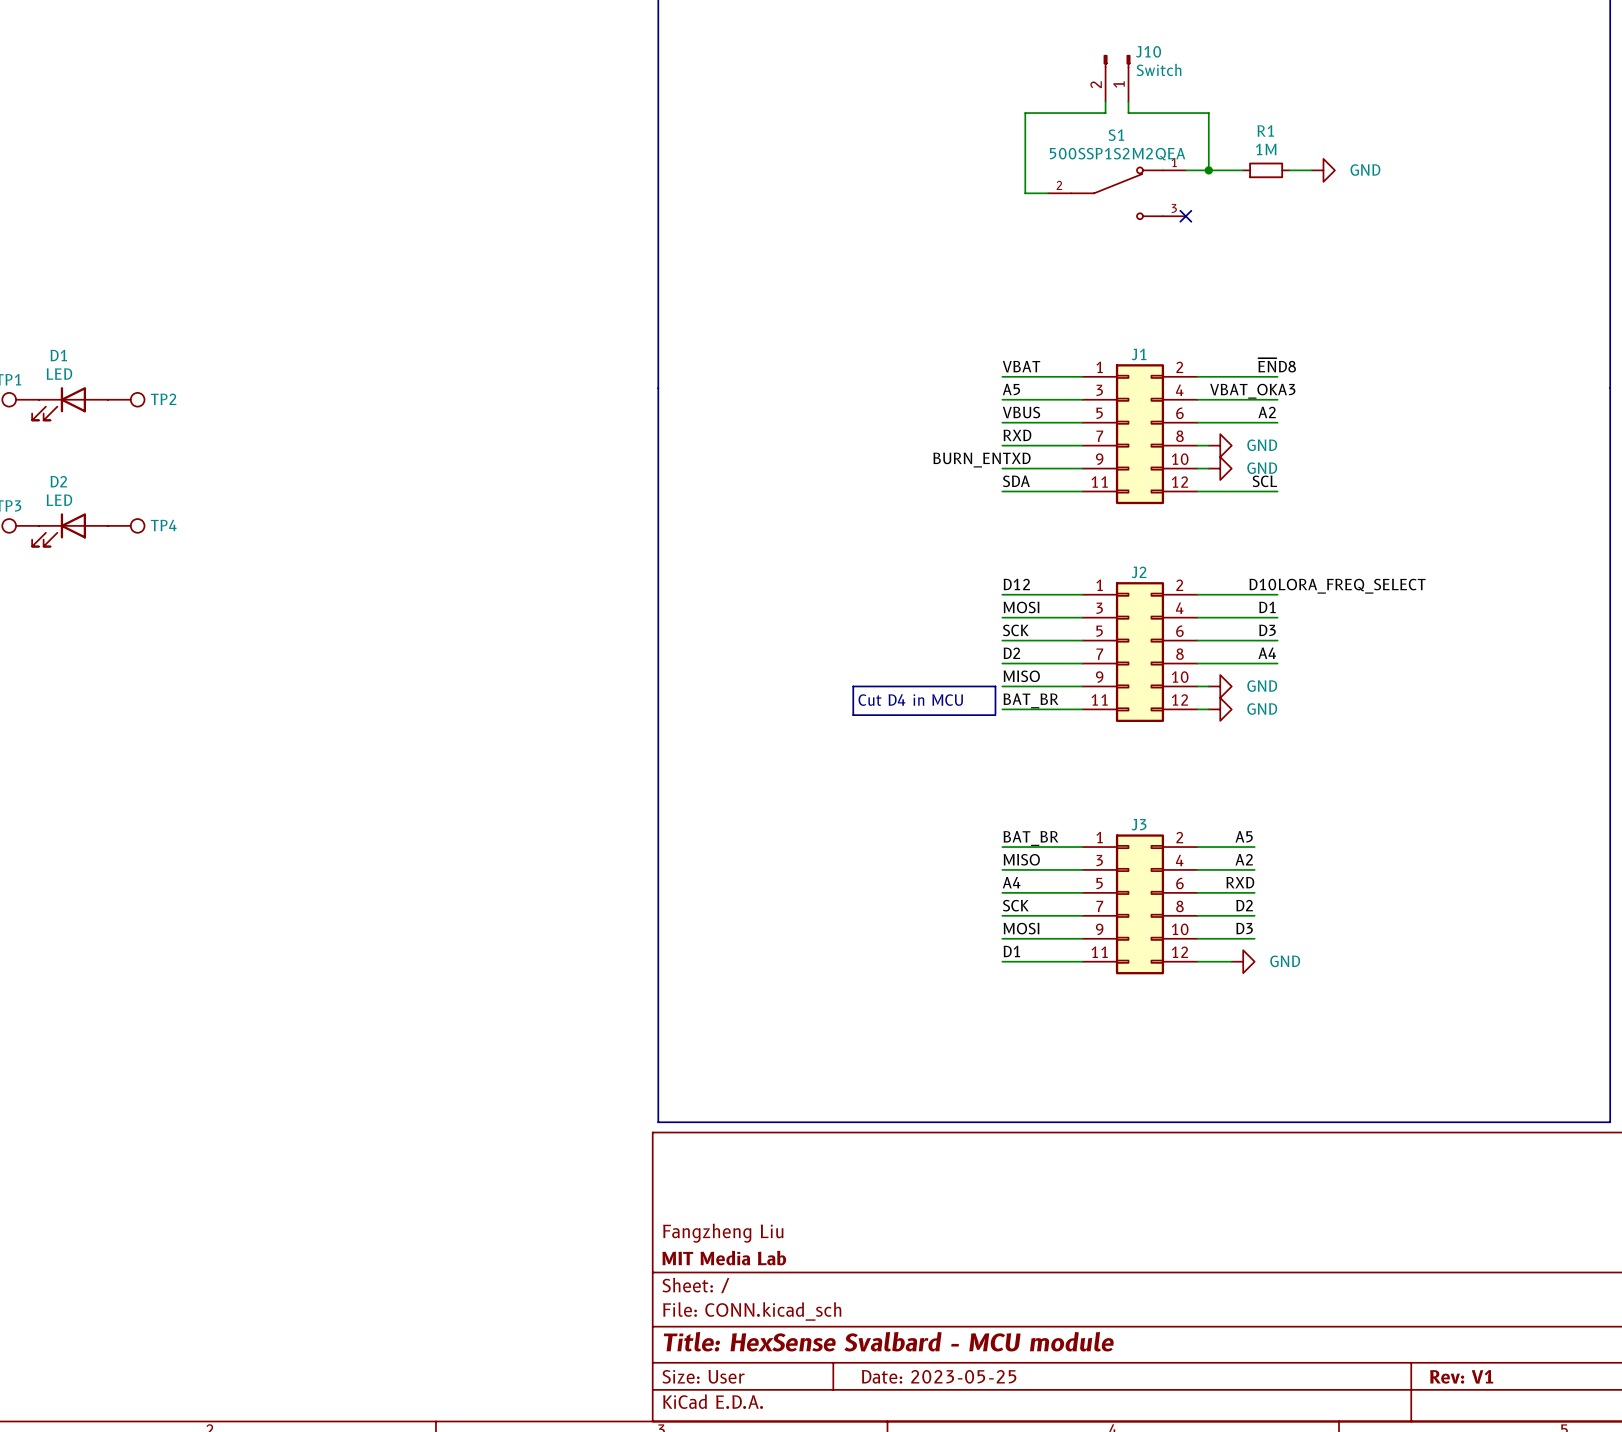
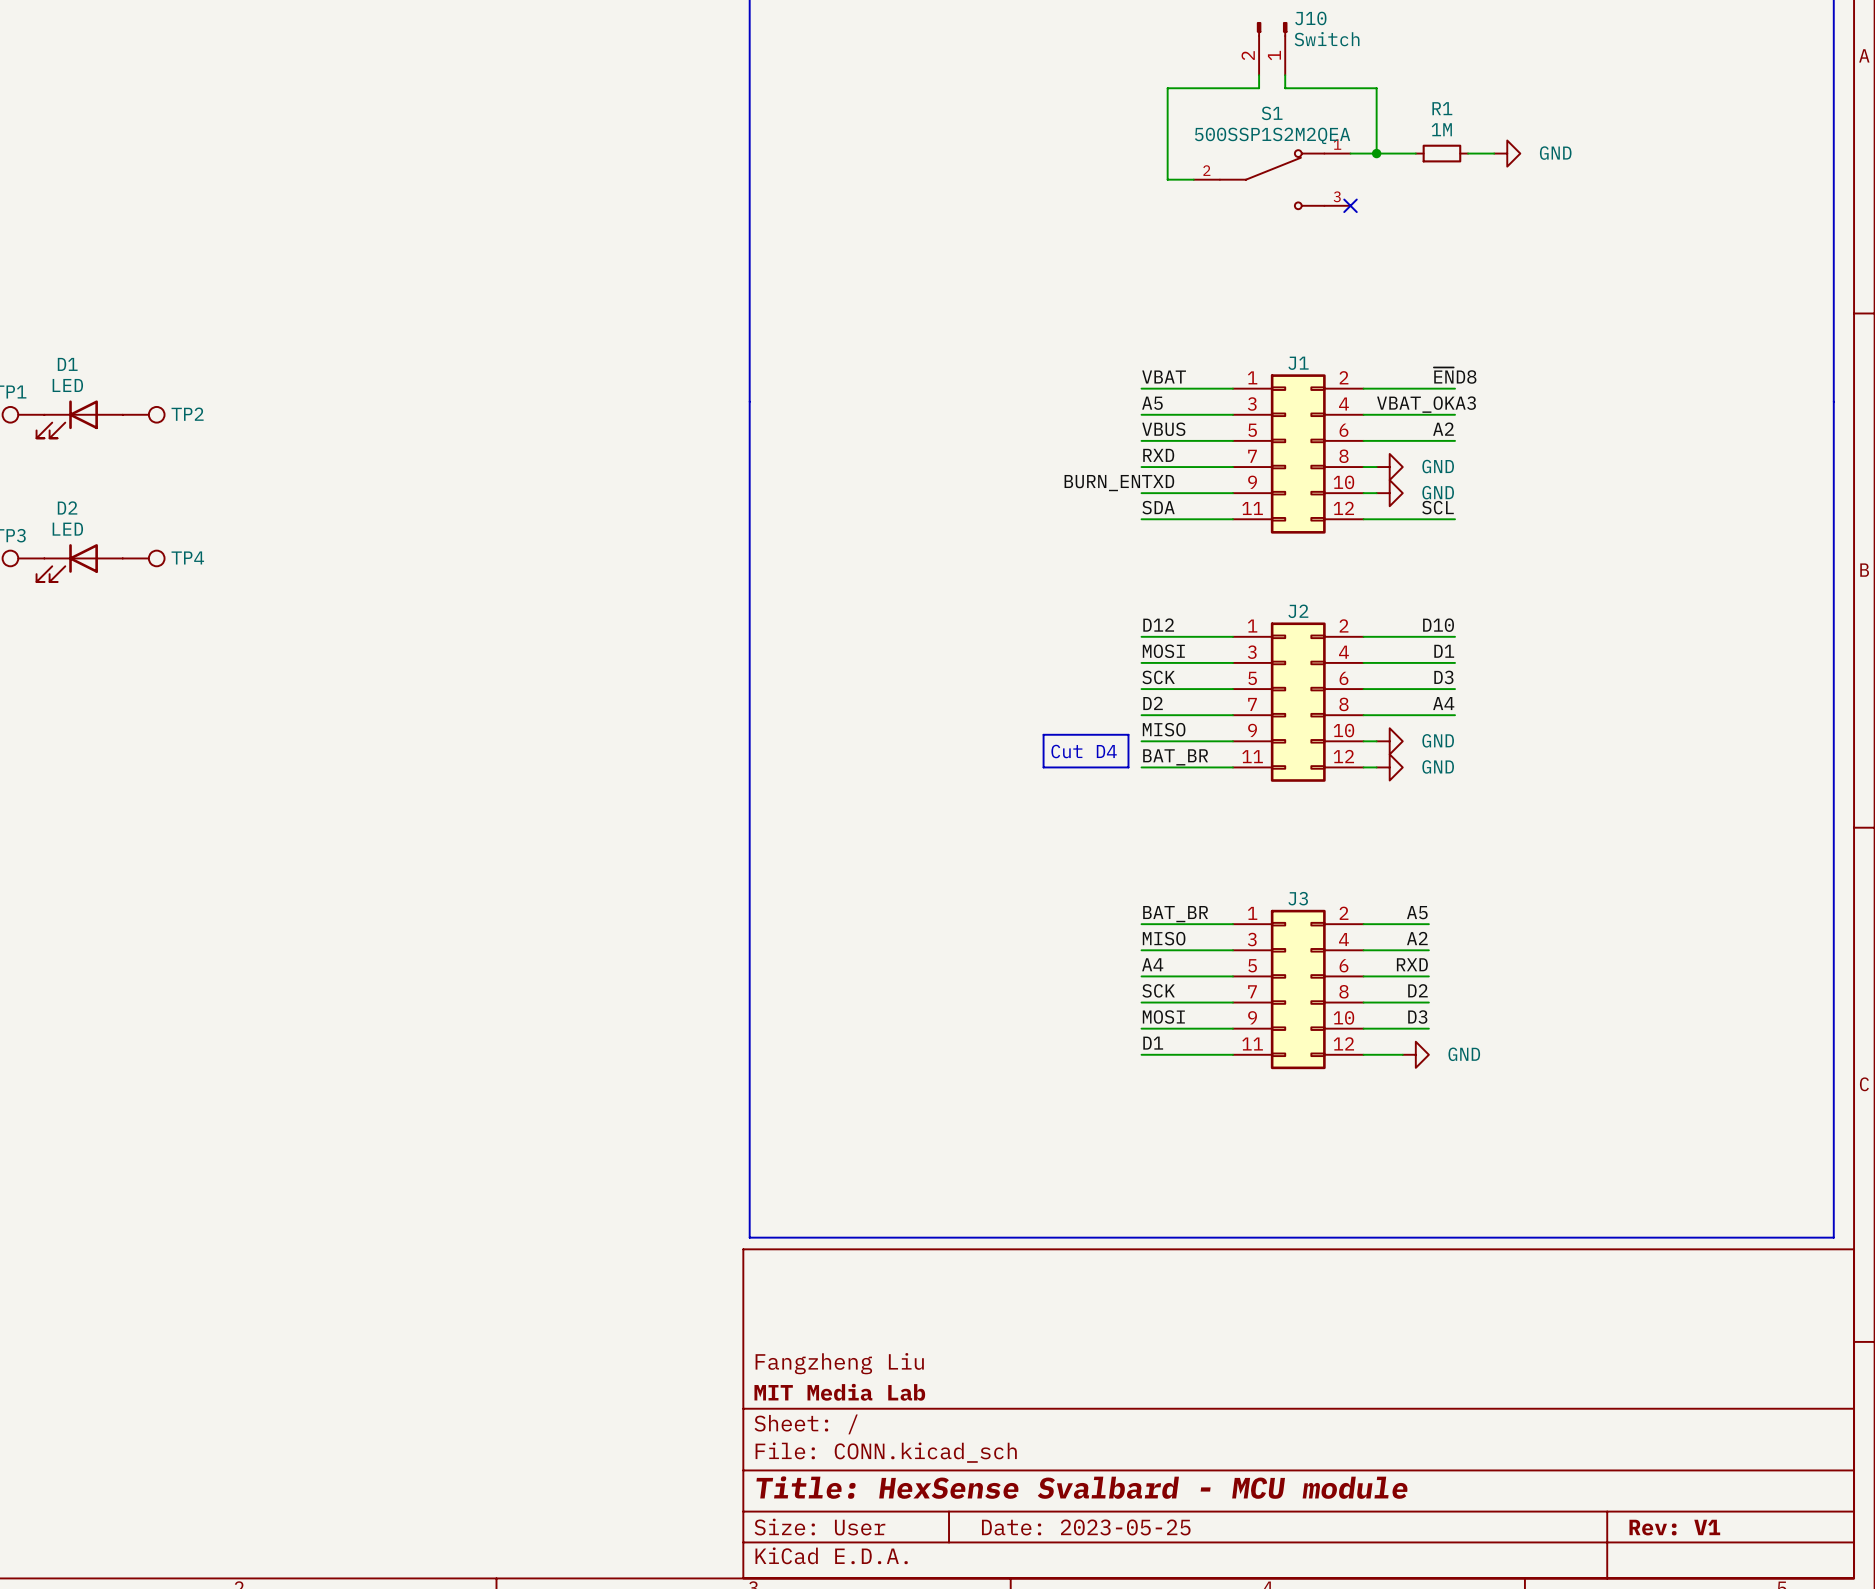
label: LORA_FREQ_SELECT (1352, 586) -> none
line: none -> (1043, 734) (1128, 734) (1128, 767) (1043, 767) (1043, 734)
text: Cut D4 in MCU (910, 700) -> Cut D4 (1084, 751)
line: (995, 713) (995, 686) (853, 686) (853, 715) (995, 715) -> none

